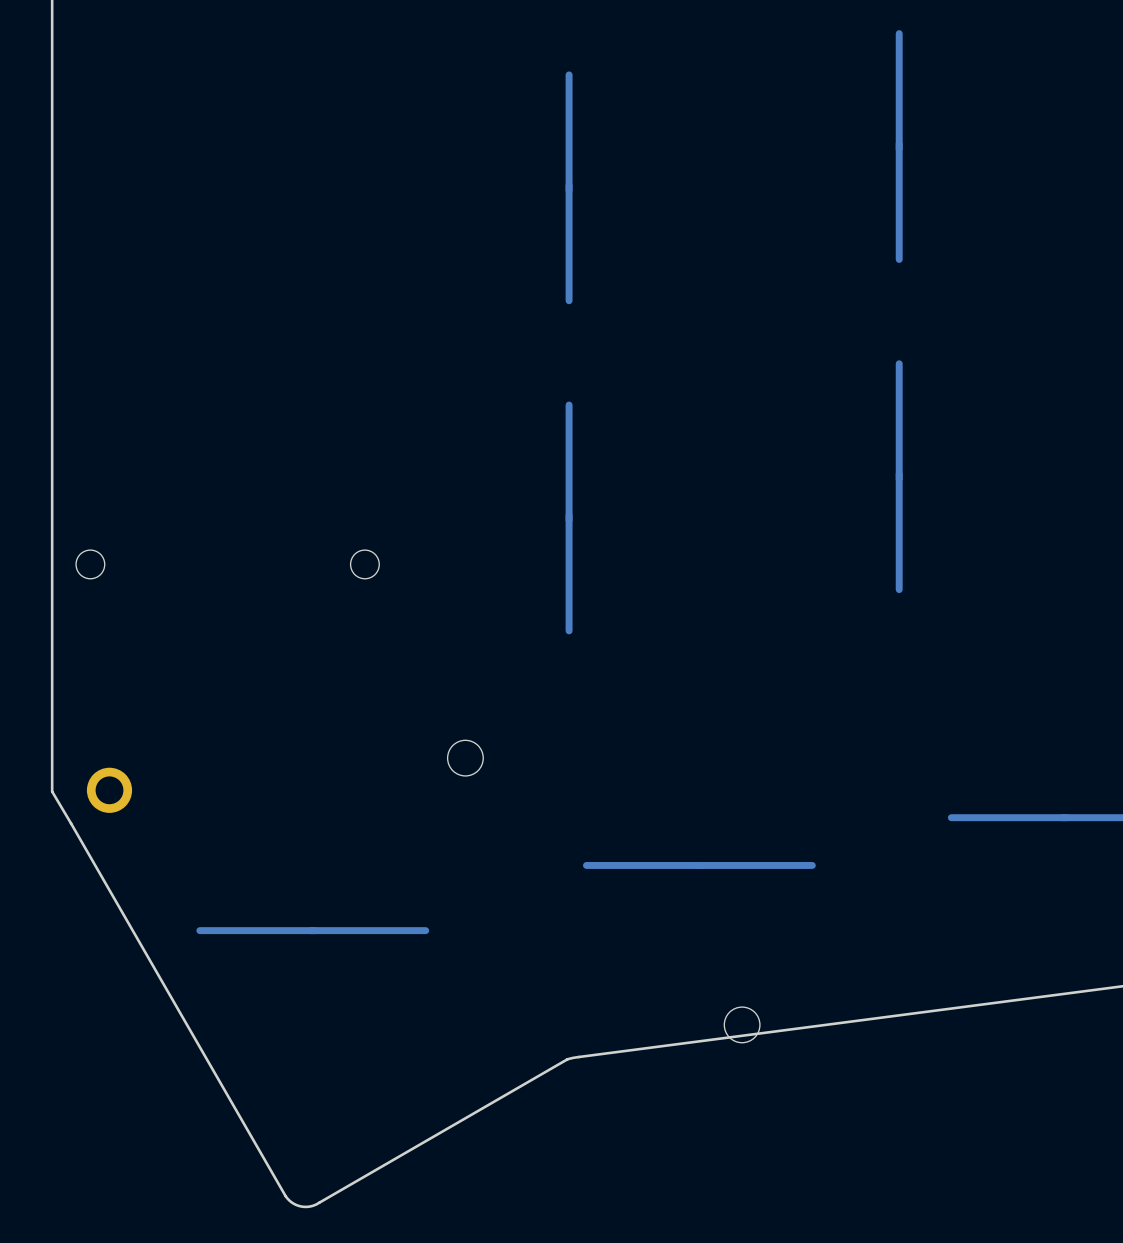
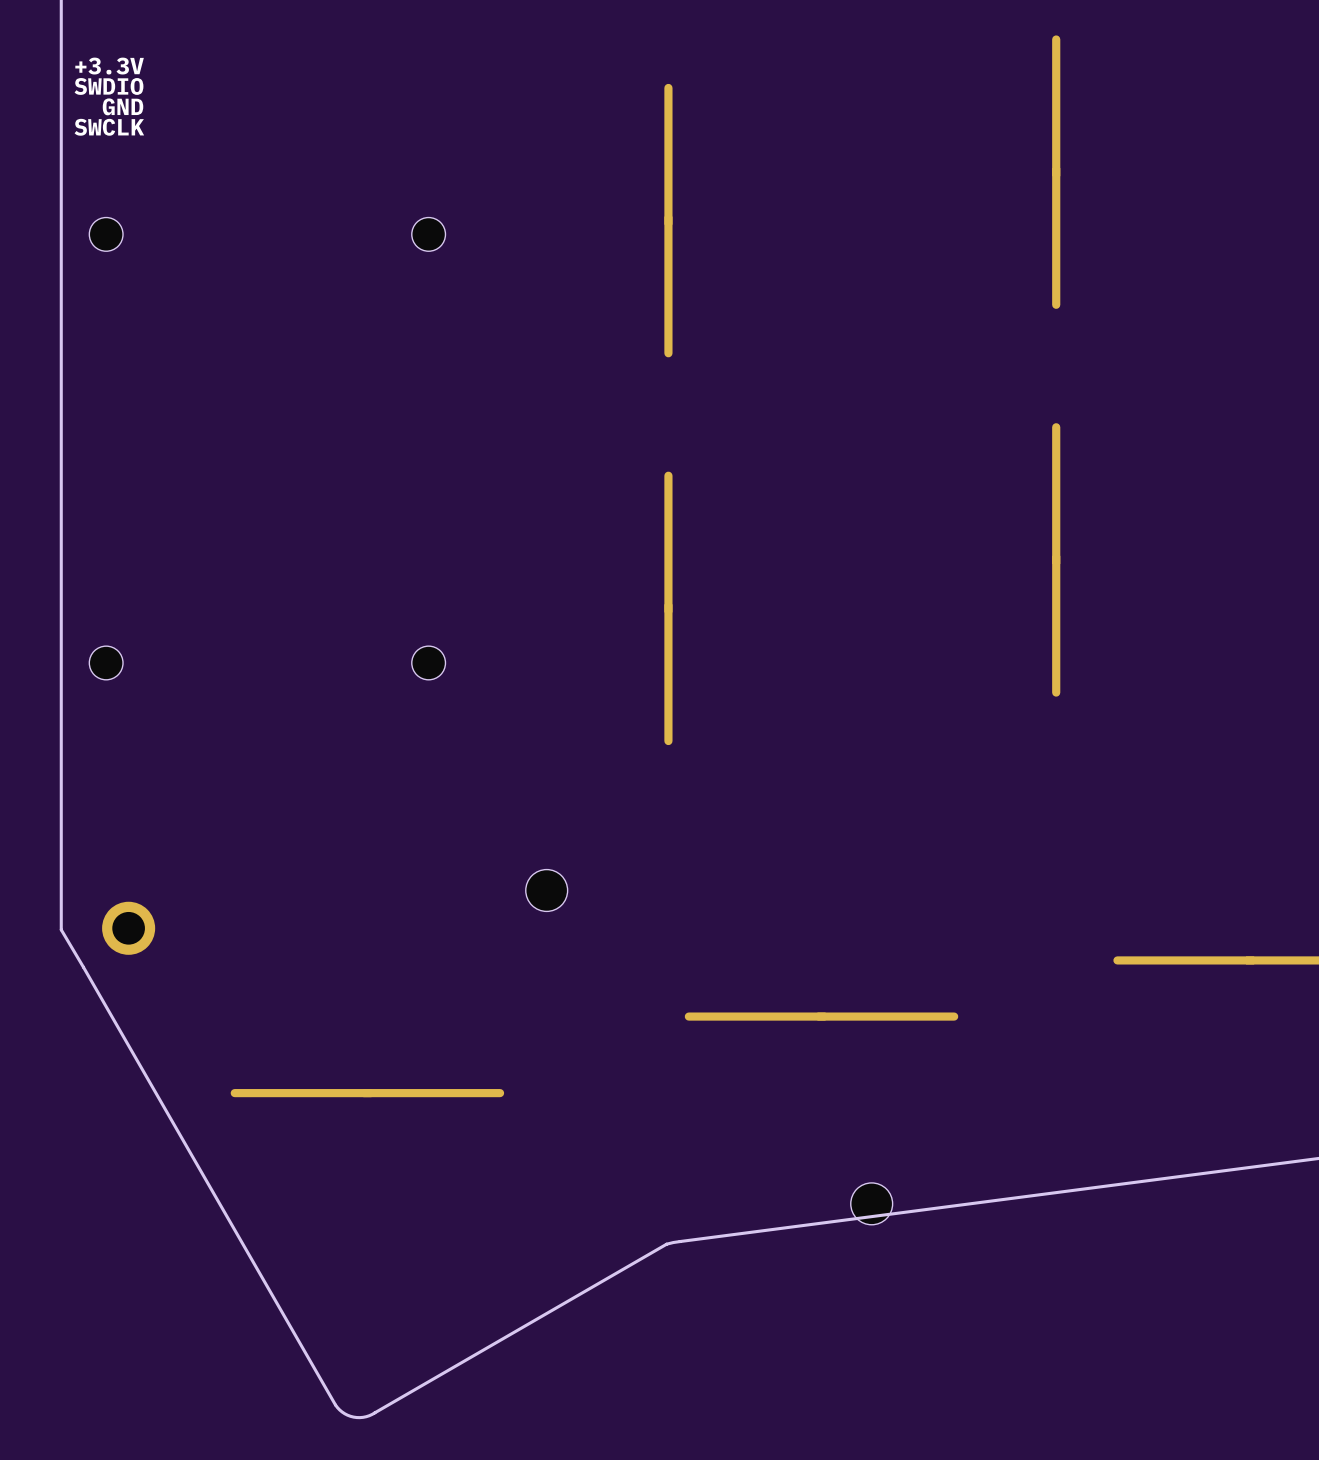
text: none -> +3.3V (109, 66)
text: none -> SWDIO (109, 86)
text: none -> GND (123, 106)
text: none -> SWCLK (109, 127)
part: none -> (106, 234)
part: none -> (428, 234)

